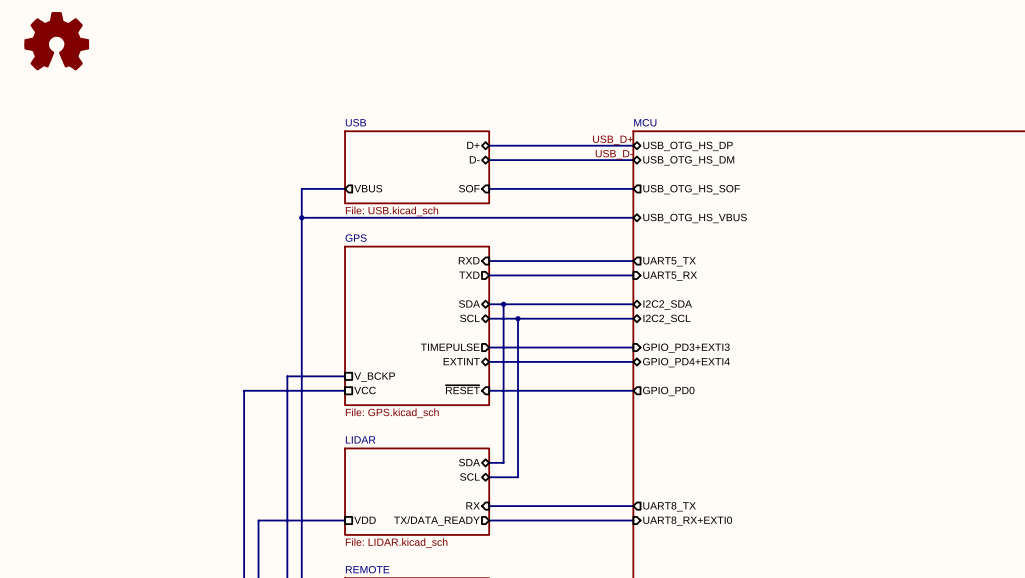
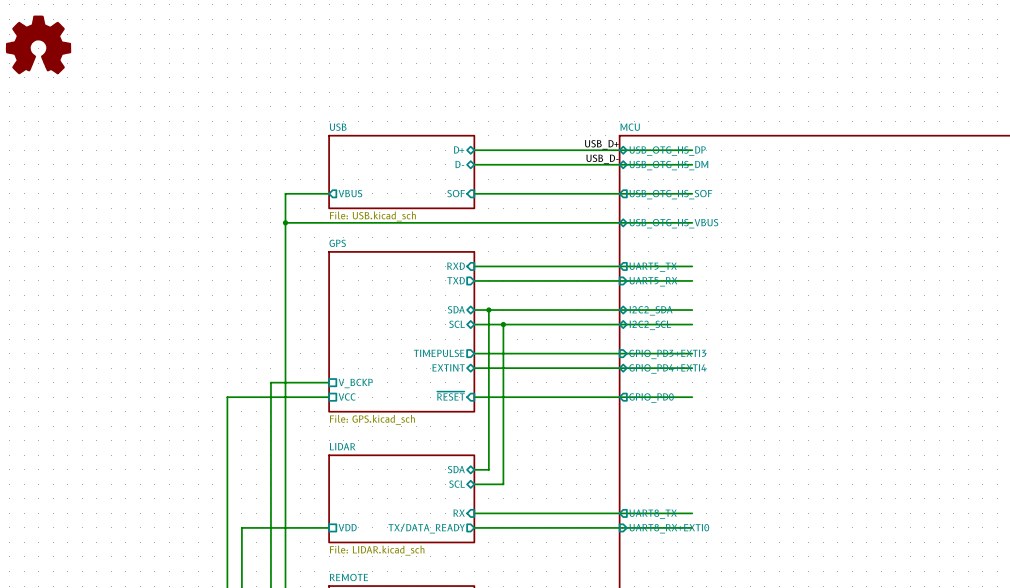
wire: none -> (619, 150) (692, 150)
wire: none -> (619, 164) (692, 164)
wire: none -> (619, 193) (692, 193)
wire: none -> (619, 222) (692, 222)
wire: none -> (619, 266) (692, 266)
wire: none -> (619, 280) (692, 280)
wire: none -> (619, 310) (692, 310)
wire: none -> (619, 324) (692, 324)
wire: none -> (619, 353) (692, 353)
wire: none -> (619, 368) (692, 368)
wire: none -> (619, 397) (692, 397)
wire: none -> (619, 513) (692, 513)
wire: none -> (619, 527) (692, 527)

